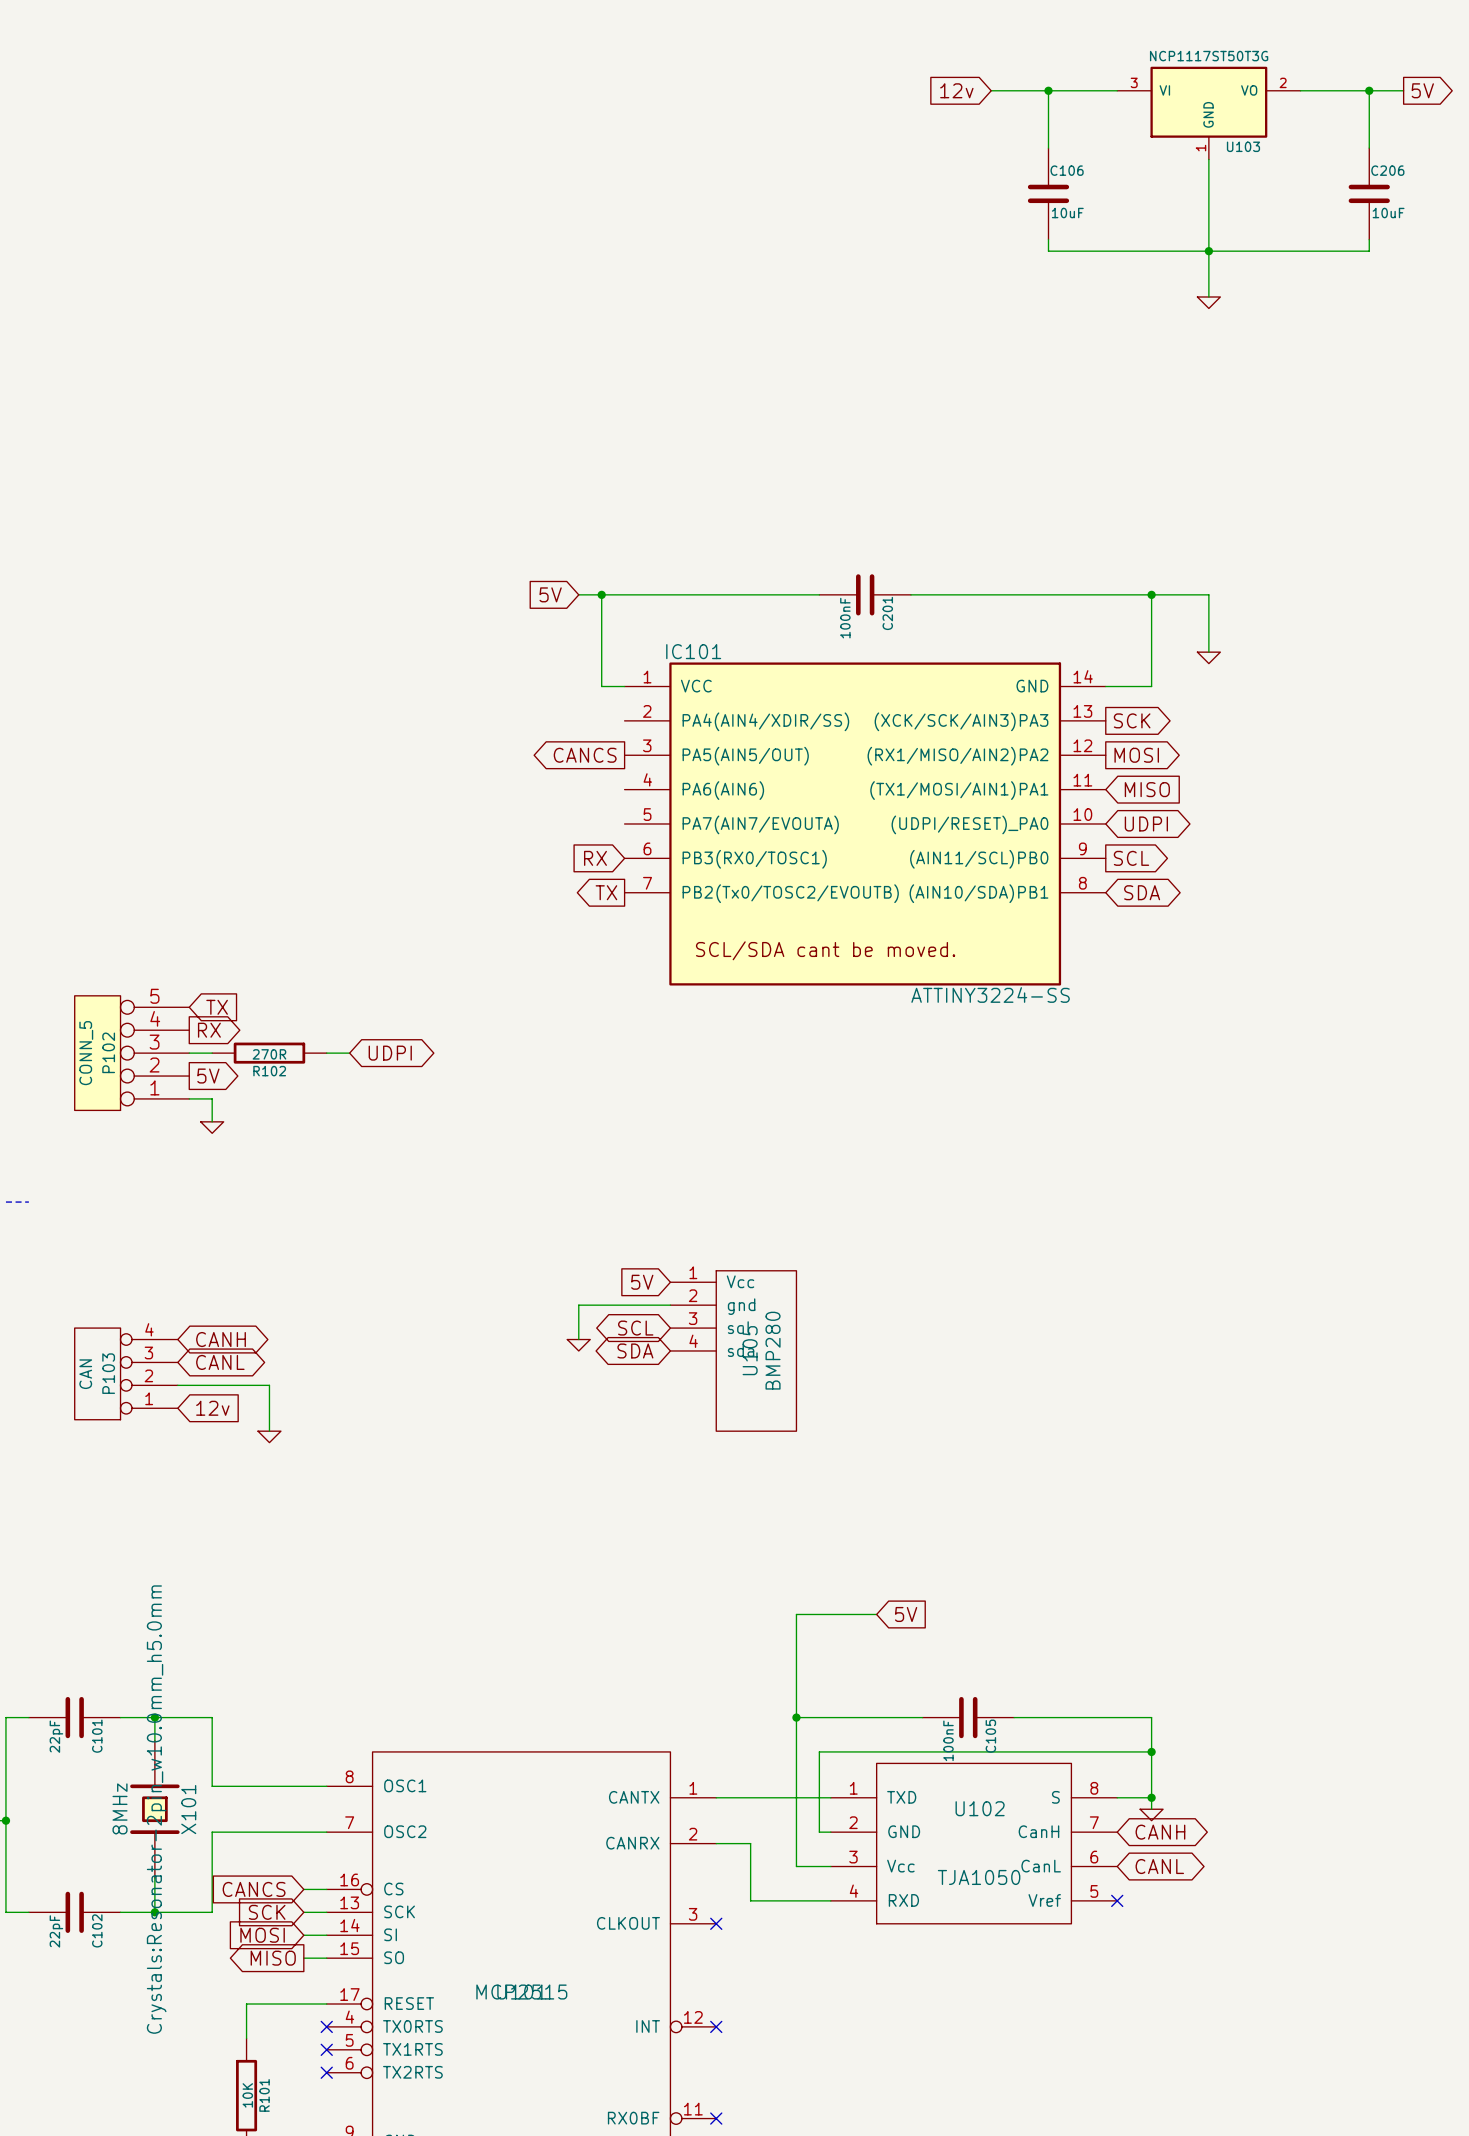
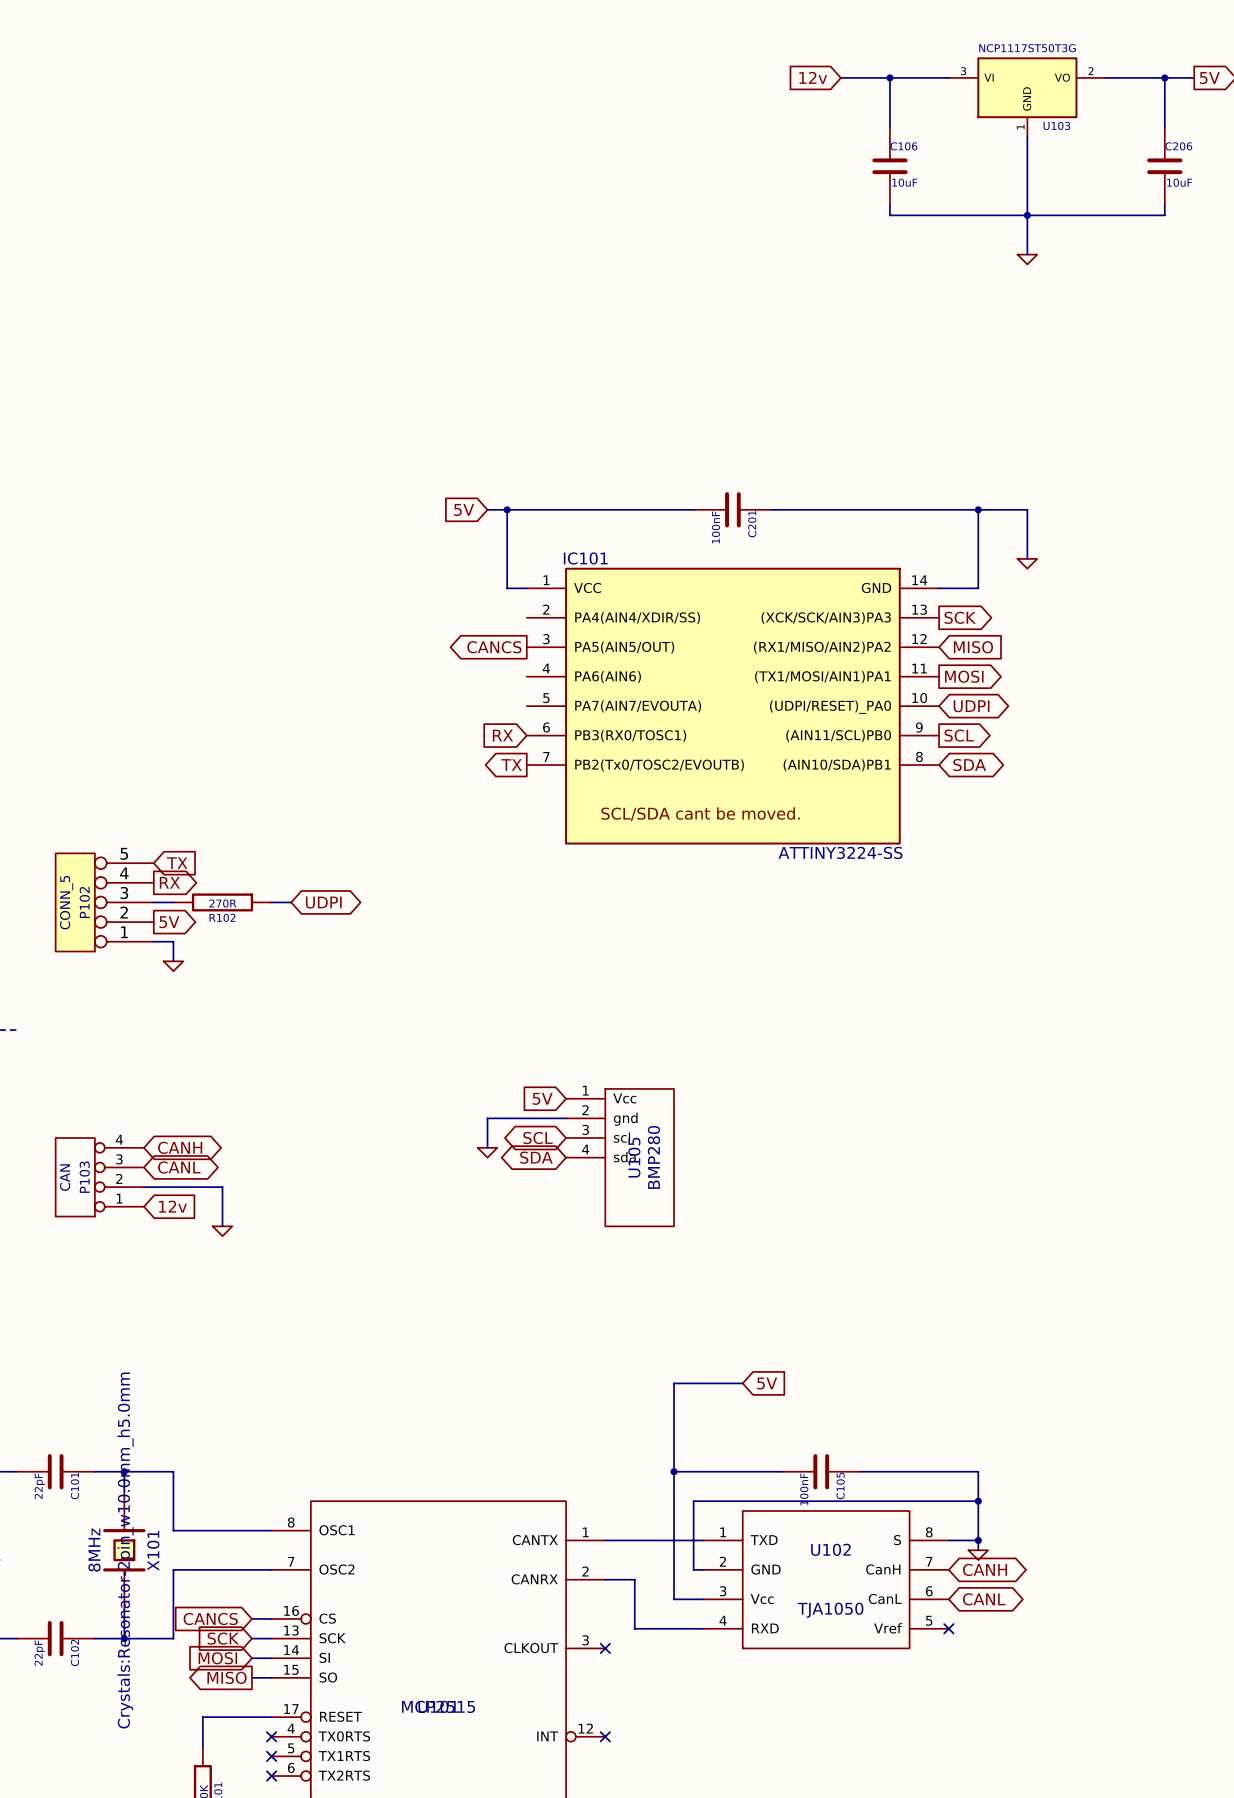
global label shape: output (1136, 755) -> input (973, 647)
global label: MOSI (1136, 755) -> MISO (973, 647)
global label shape: input (1147, 789) -> output (964, 676)
global label: MISO (1147, 789) -> MOSI (964, 676)

